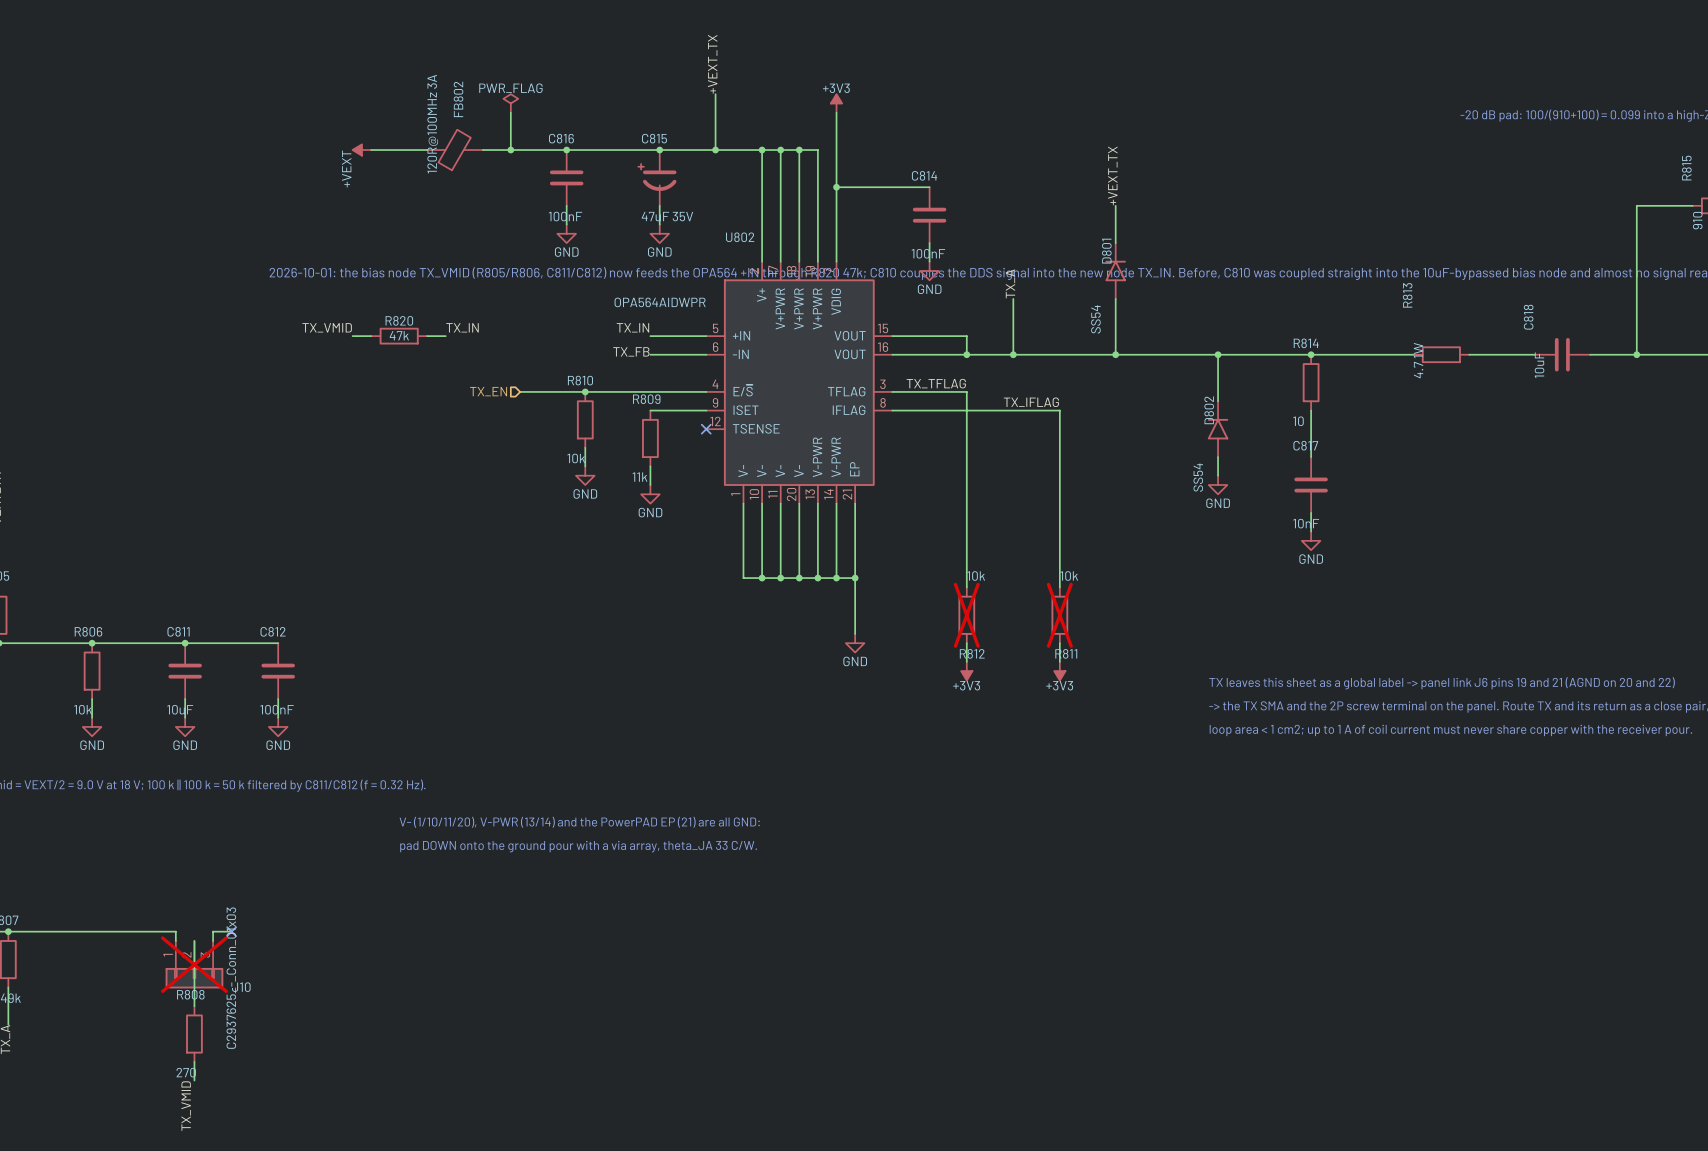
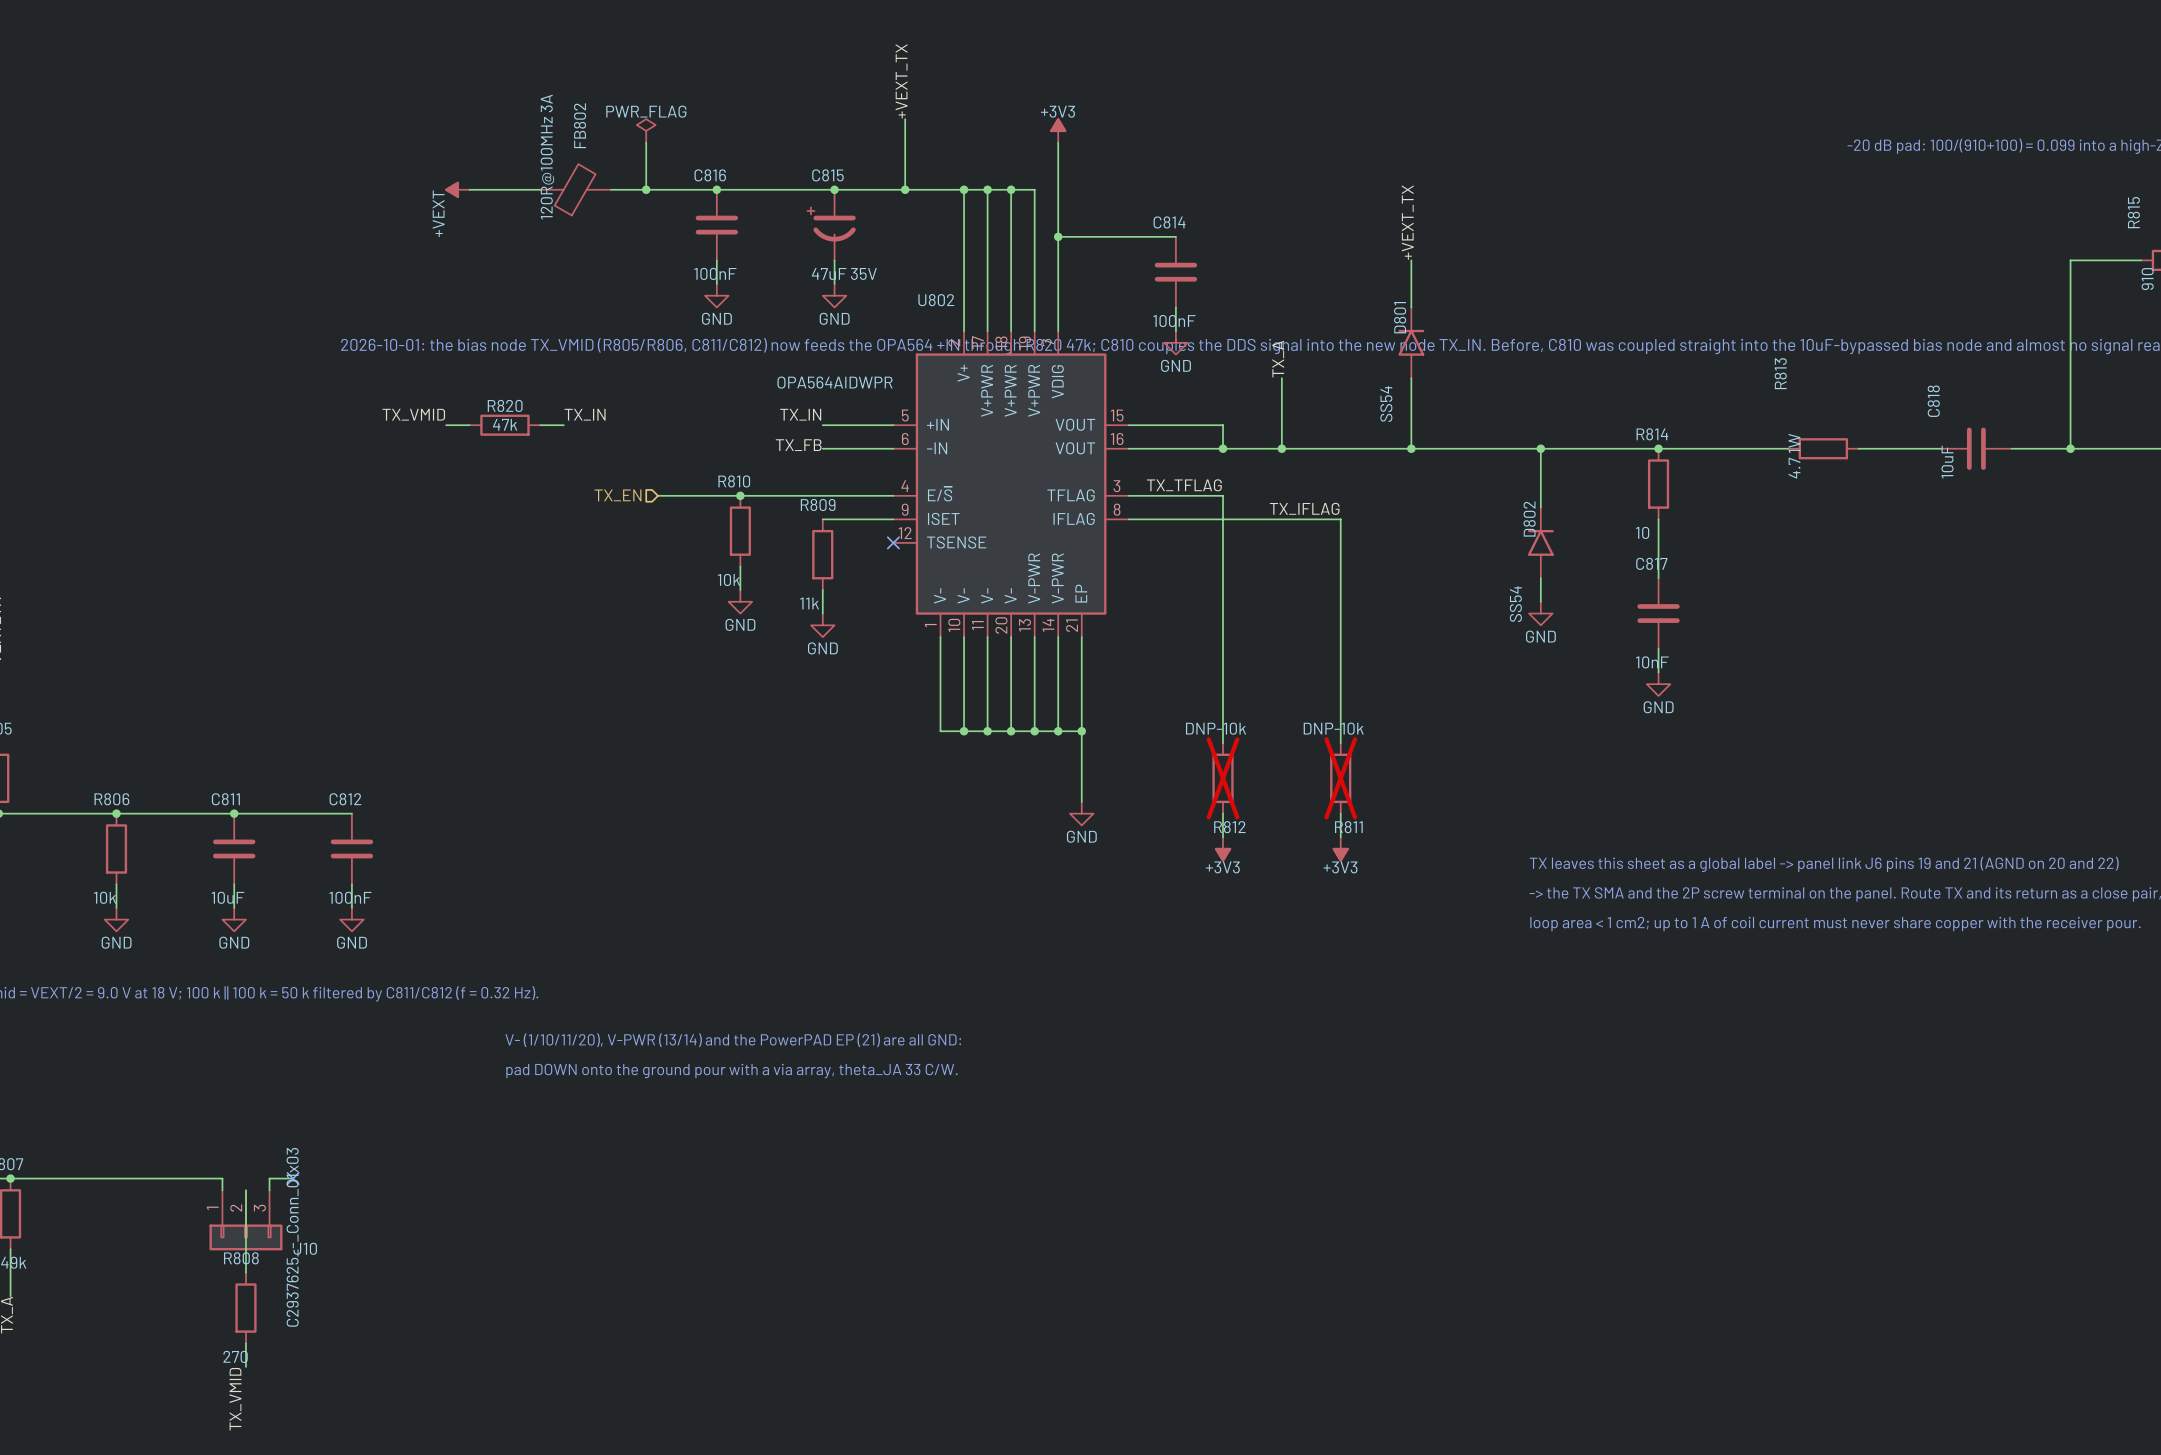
R812 value: 10k (976, 576) -> DNP-10k (1216, 728)
R811 value: 10k (1069, 576) -> DNP-10k (1333, 728)
J10 do-not-place cross: (194, 964) -> none

